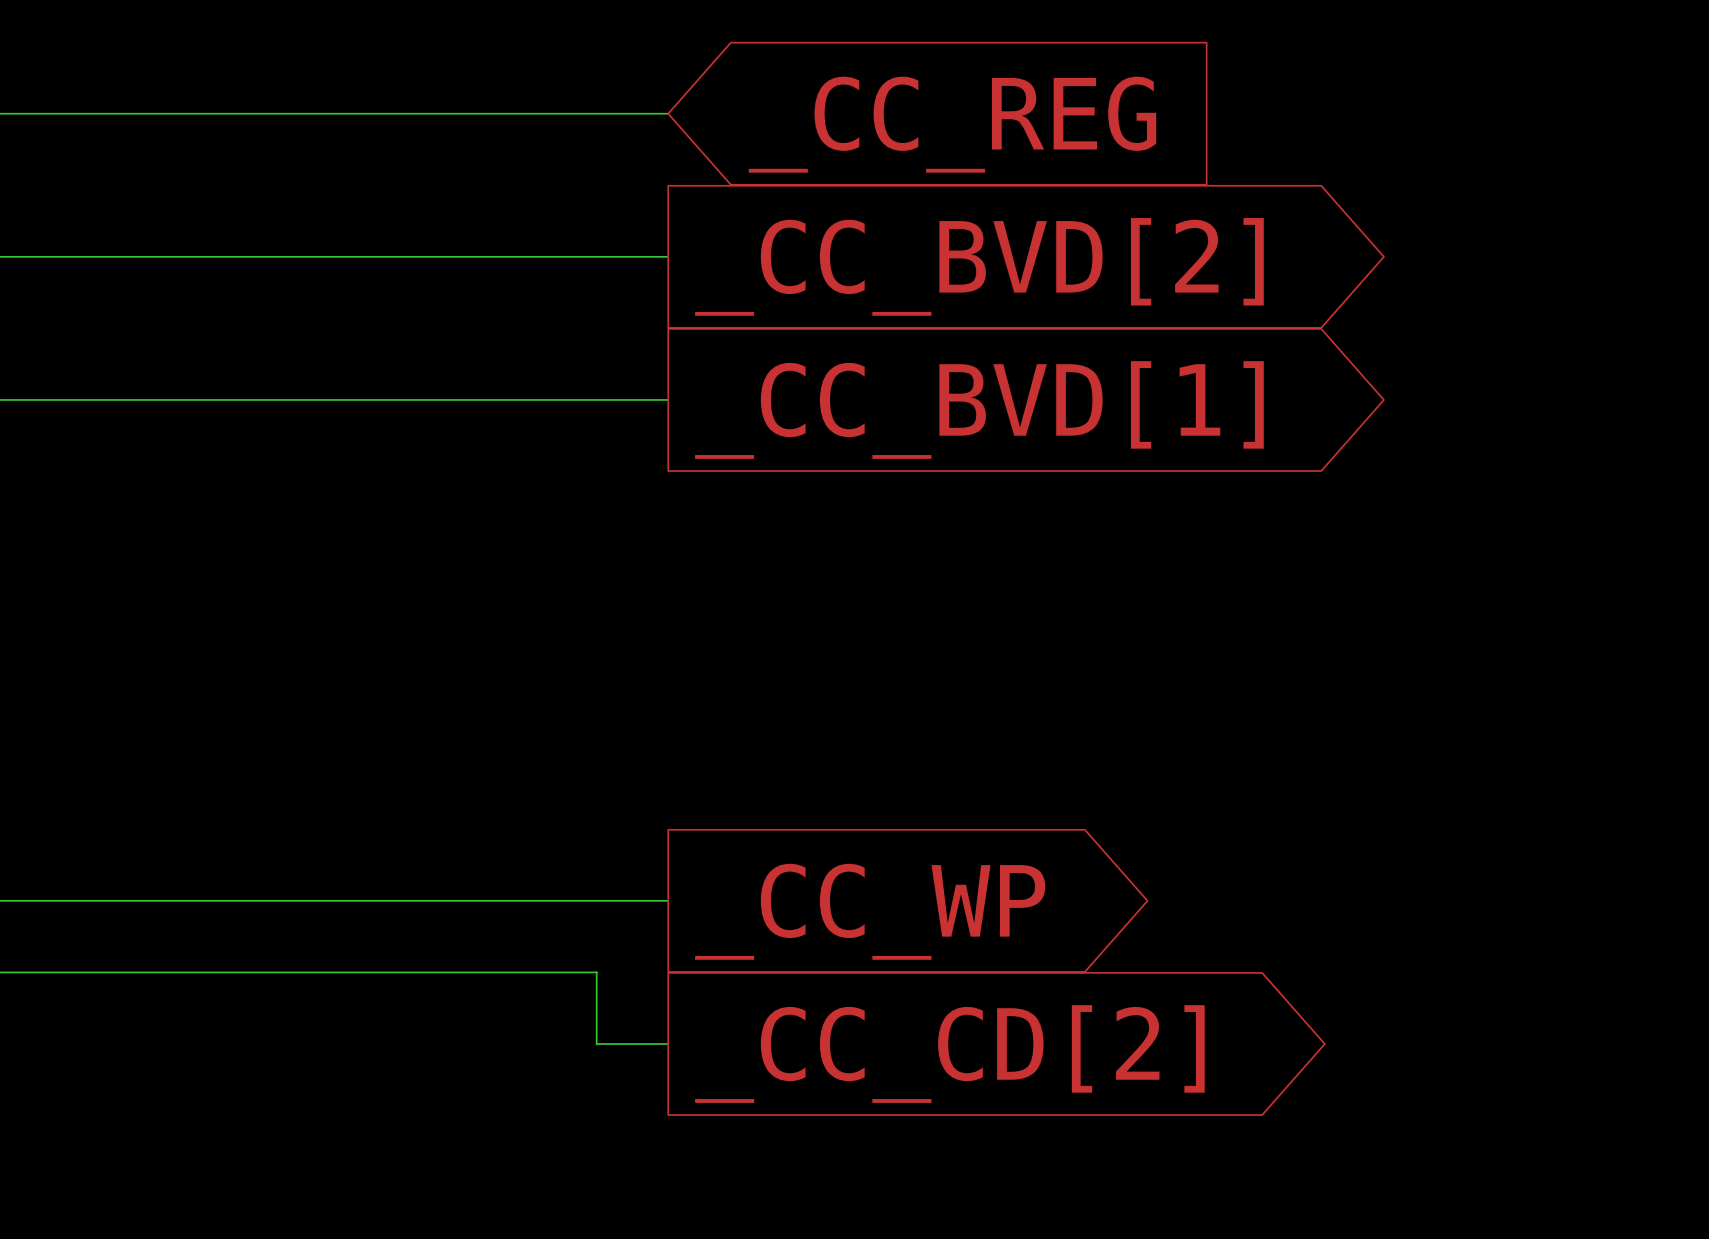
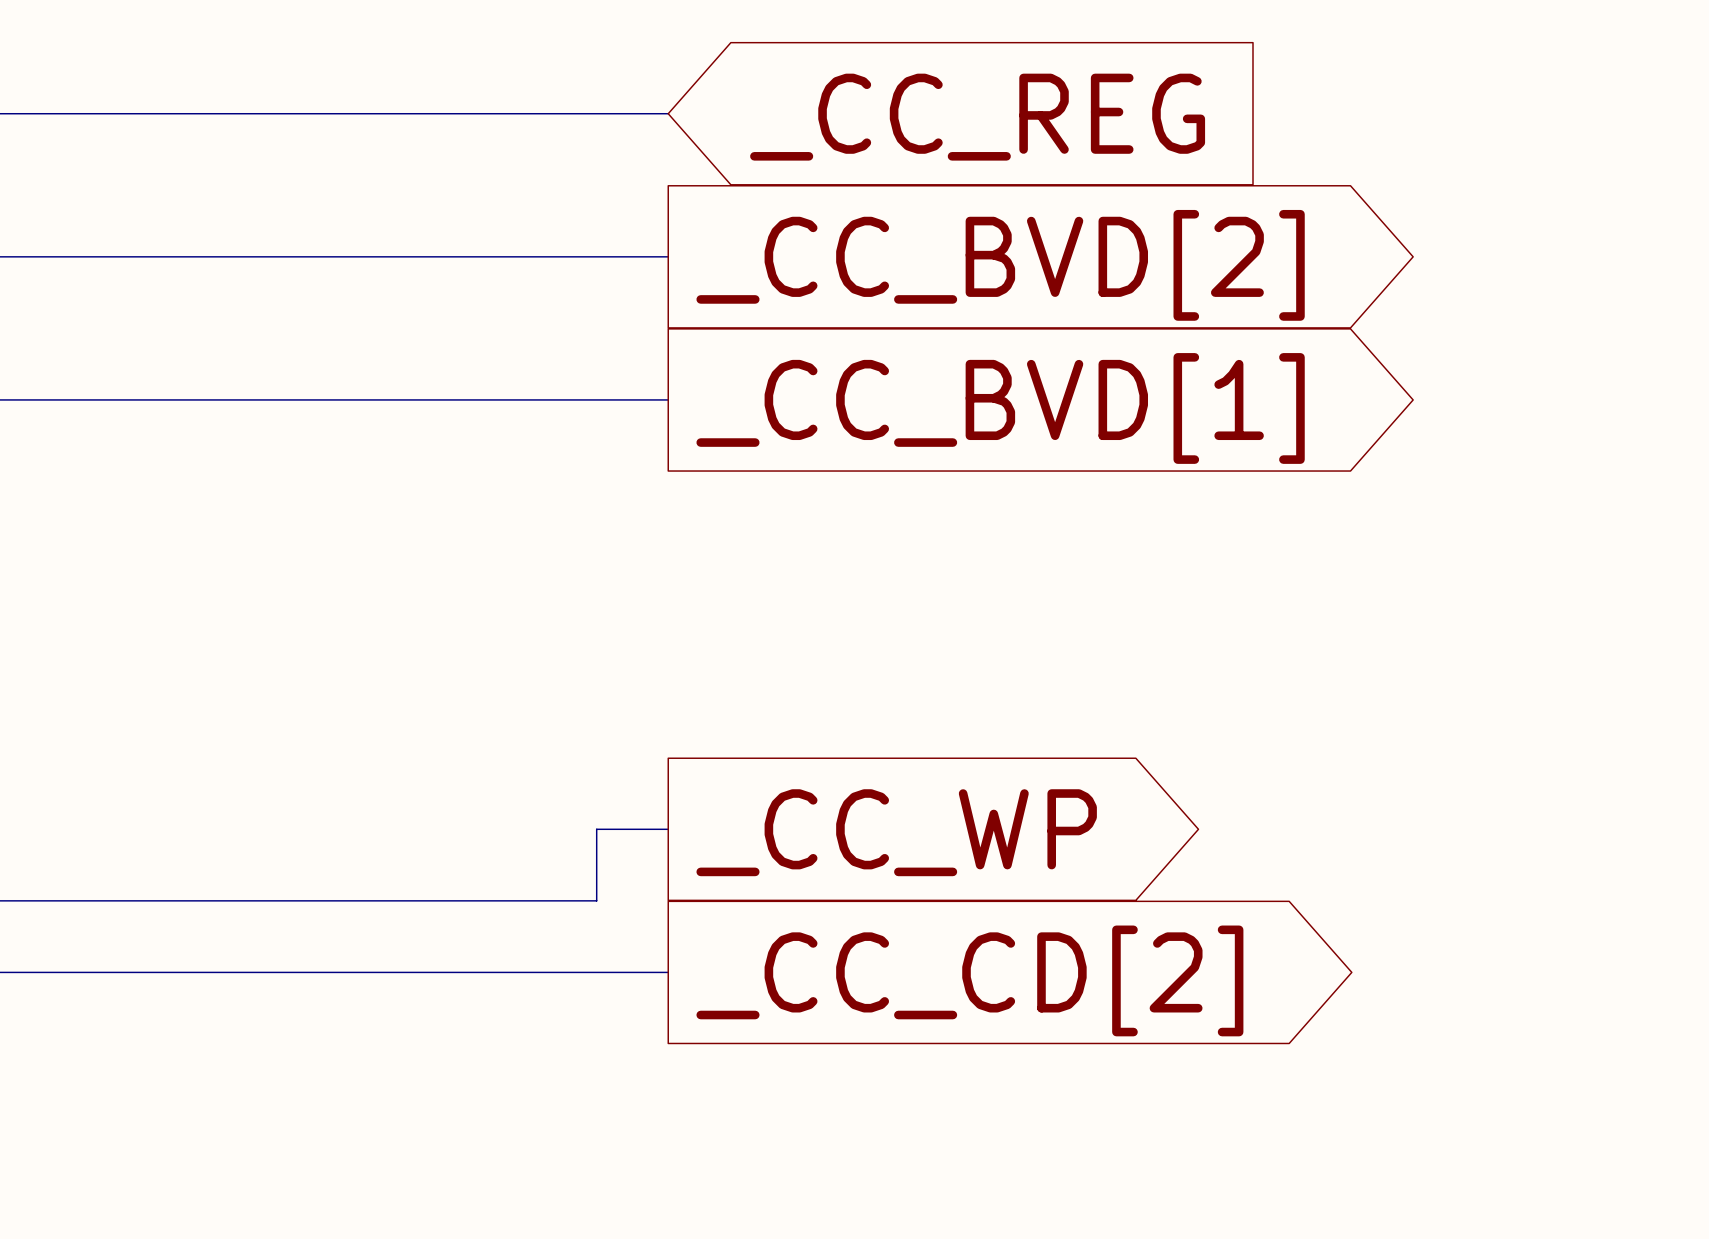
wire: (596, 900) (668, 900) -> (596, 900) (596, 829) (668, 829)
global label position: _CC_WP (870, 911) -> _CC_WP (896, 832)
wire: (596, 972) (596, 1043) (668, 1043) -> (596, 972) (668, 972)
global label position: _CC_CD[2] (949, 1054) -> _CC_CD[2] (969, 980)

